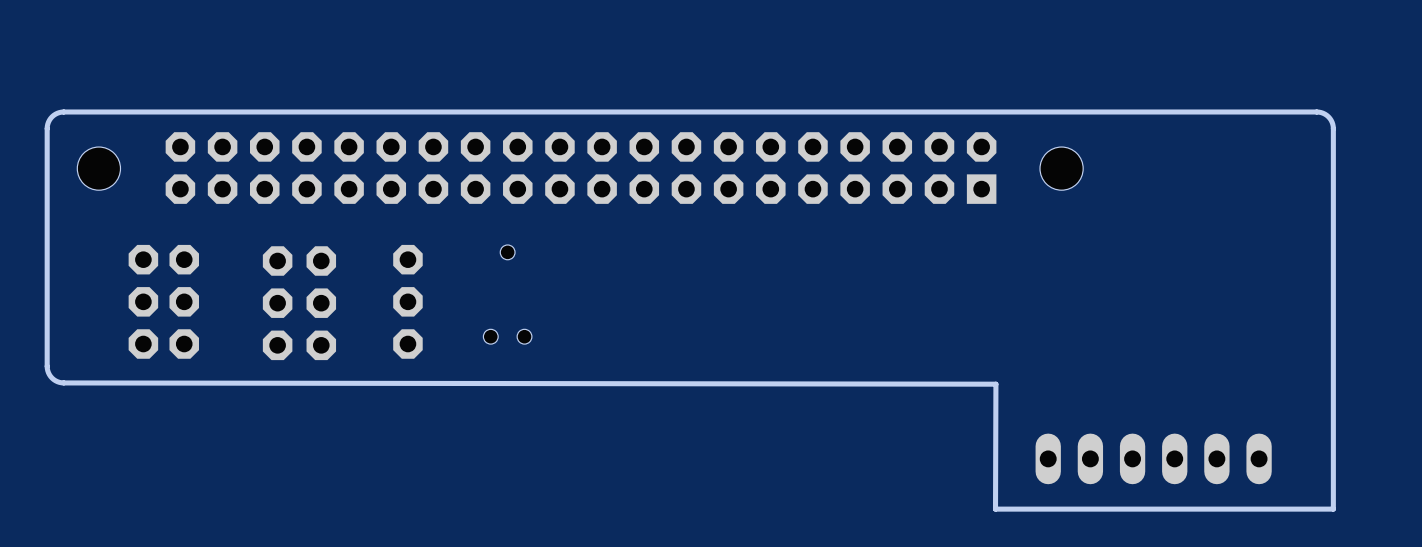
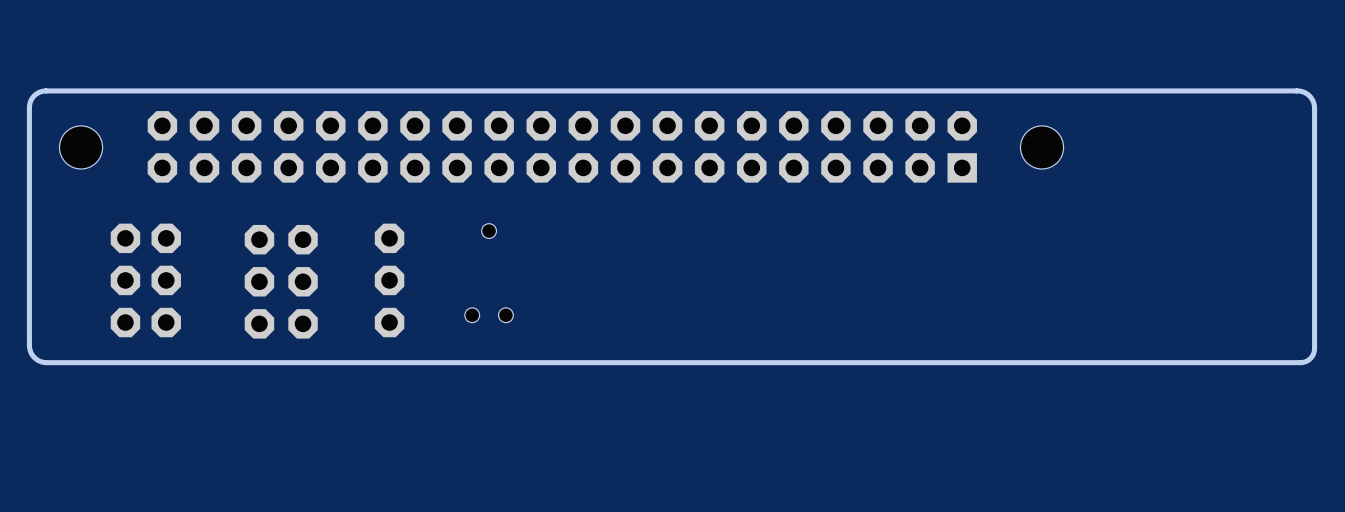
board edge: (1316, 111) (1328, 116) (1333, 128) (1333, 509) (995, 509) (995, 384) (63, 382) (52, 378) (47, 366) -> (1296, 90) (1309, 95) (1314, 107) (1314, 348) (1311, 357) (1304, 362) (45, 362) (34, 357) (29, 344)
part: (1153, 458) -> none

